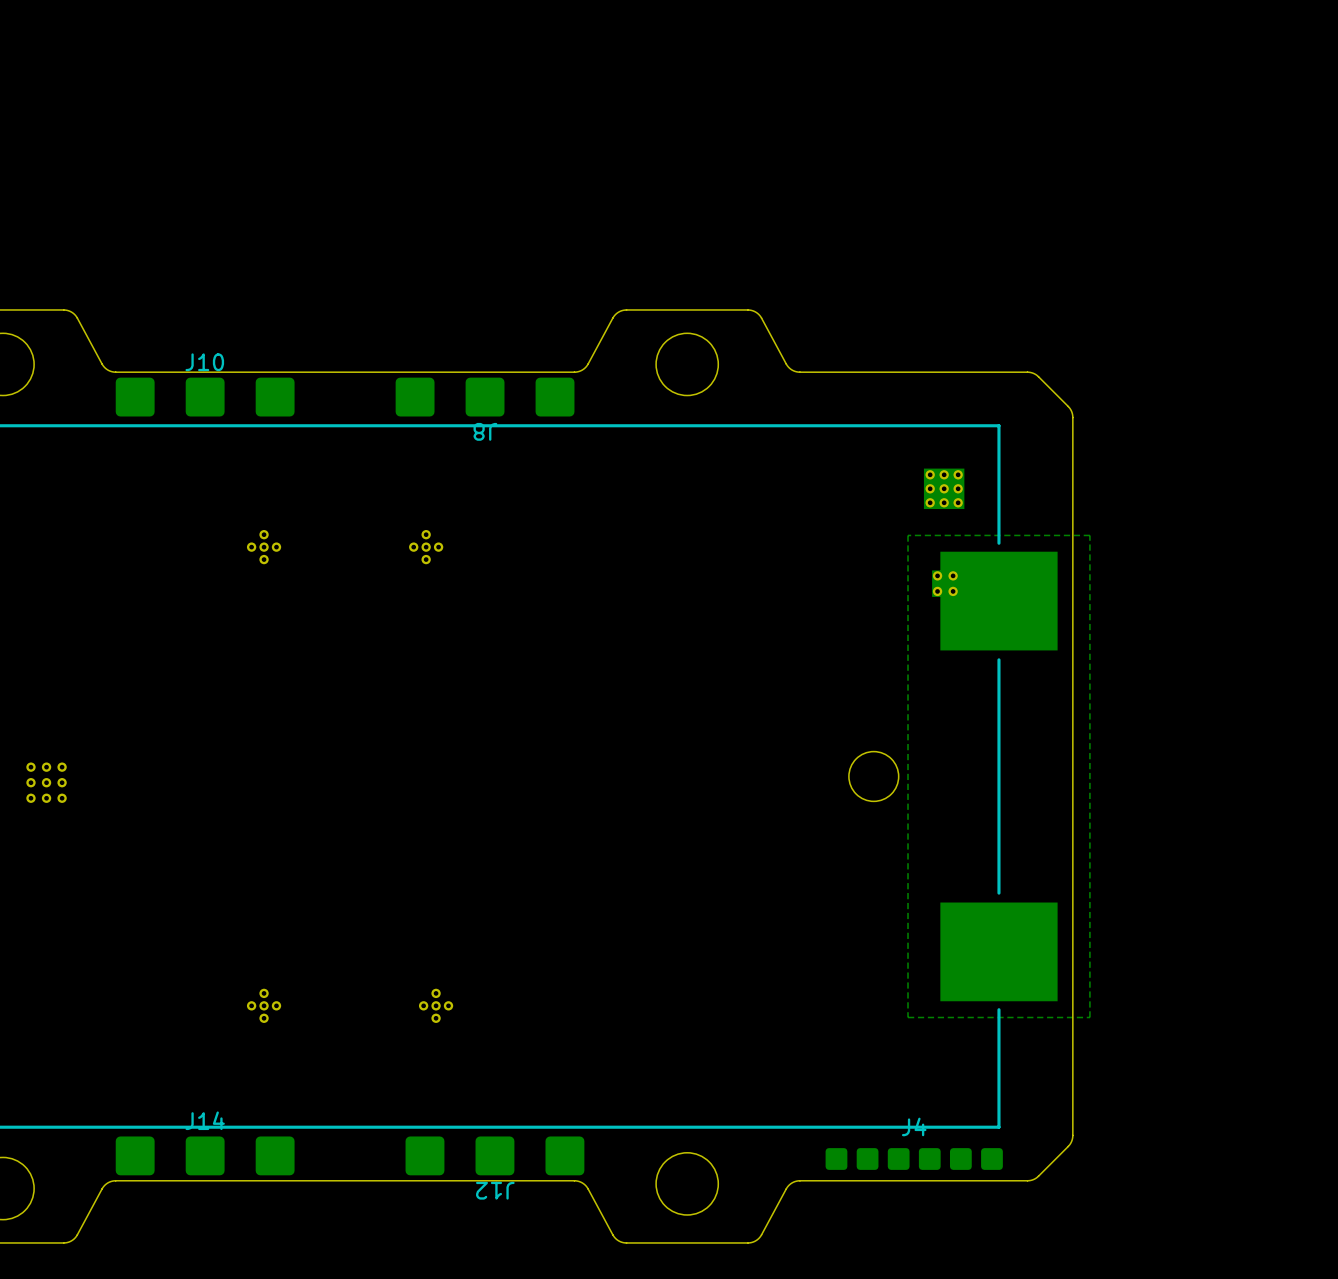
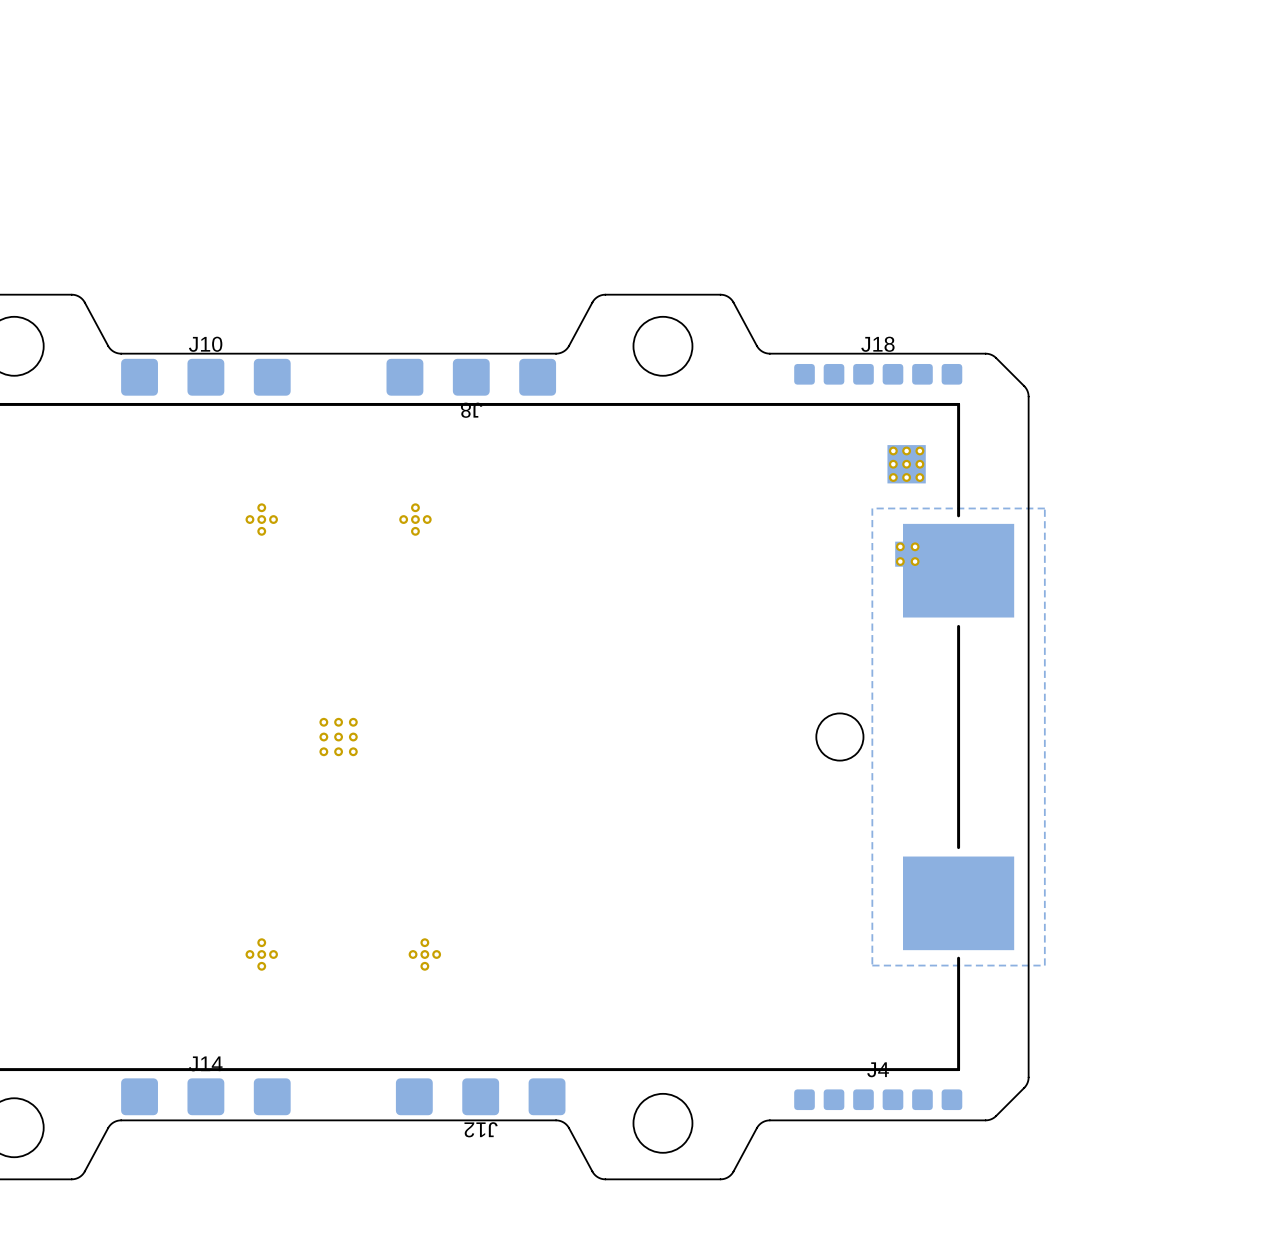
J18: none -> (878, 374)
part position: (46, 782) -> (338, 737)

